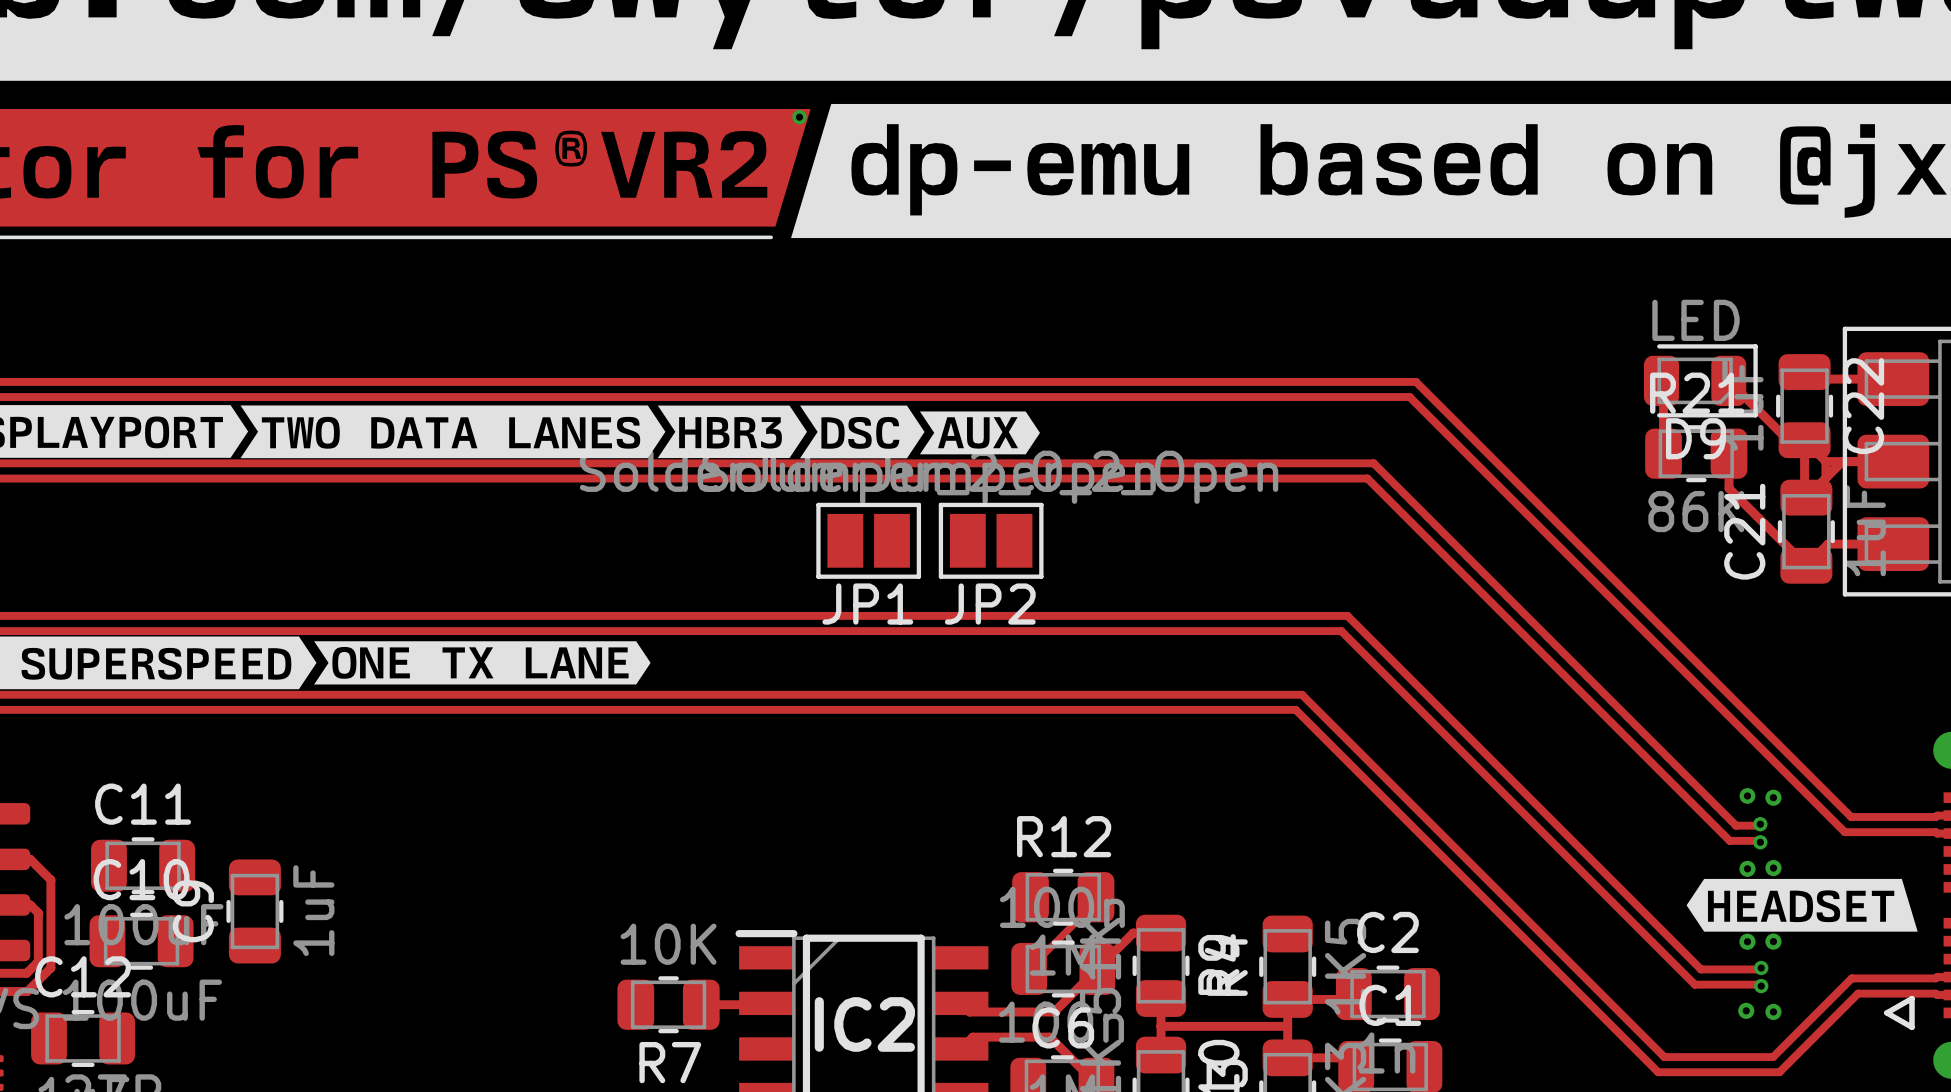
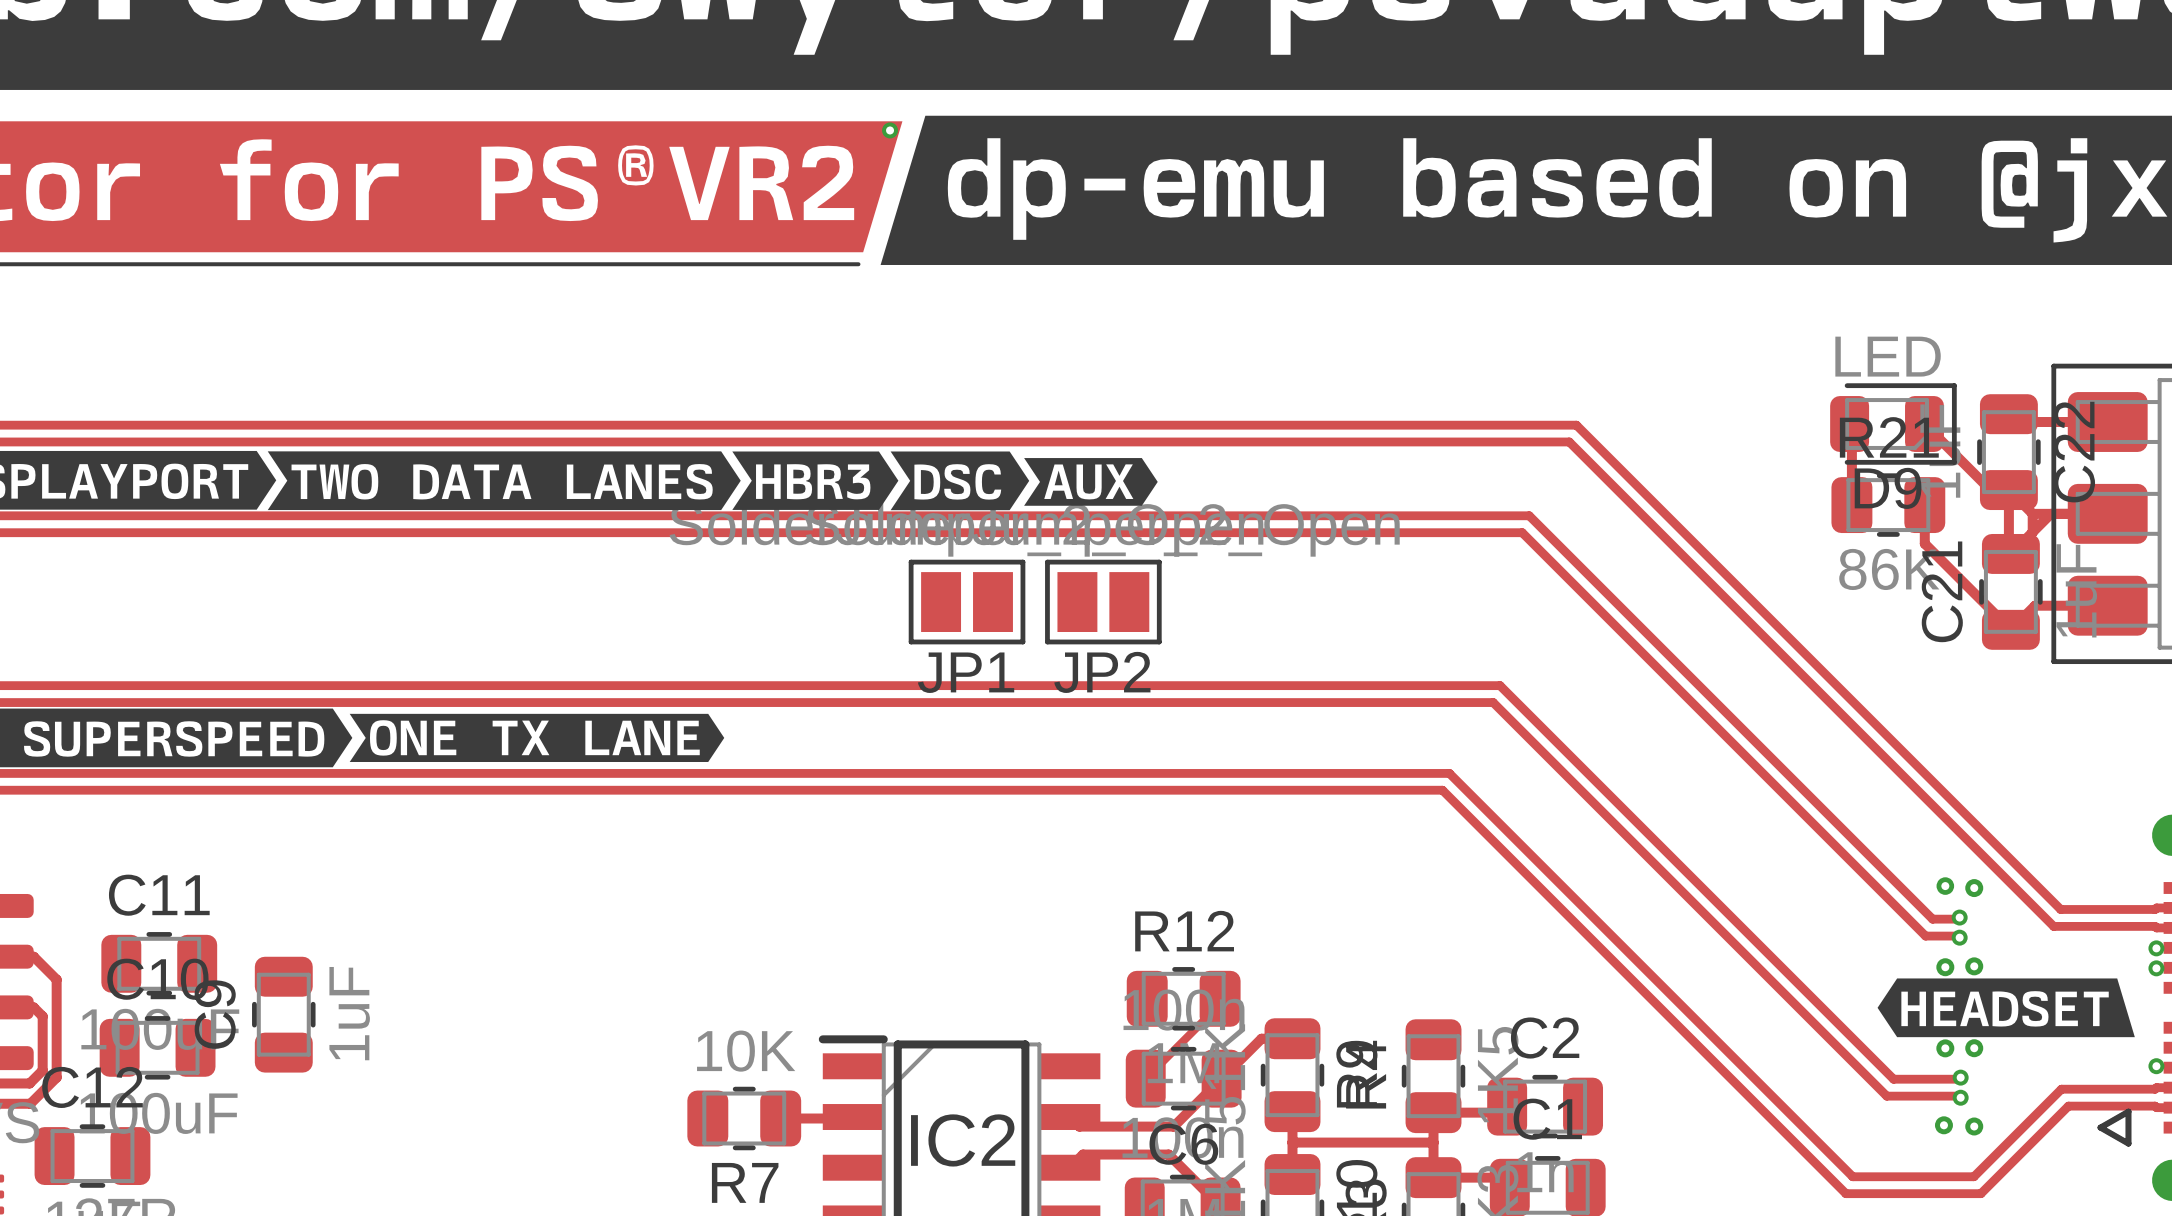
via: none -> (2156, 948)
via: none -> (2156, 968)
via: none -> (2156, 1066)

